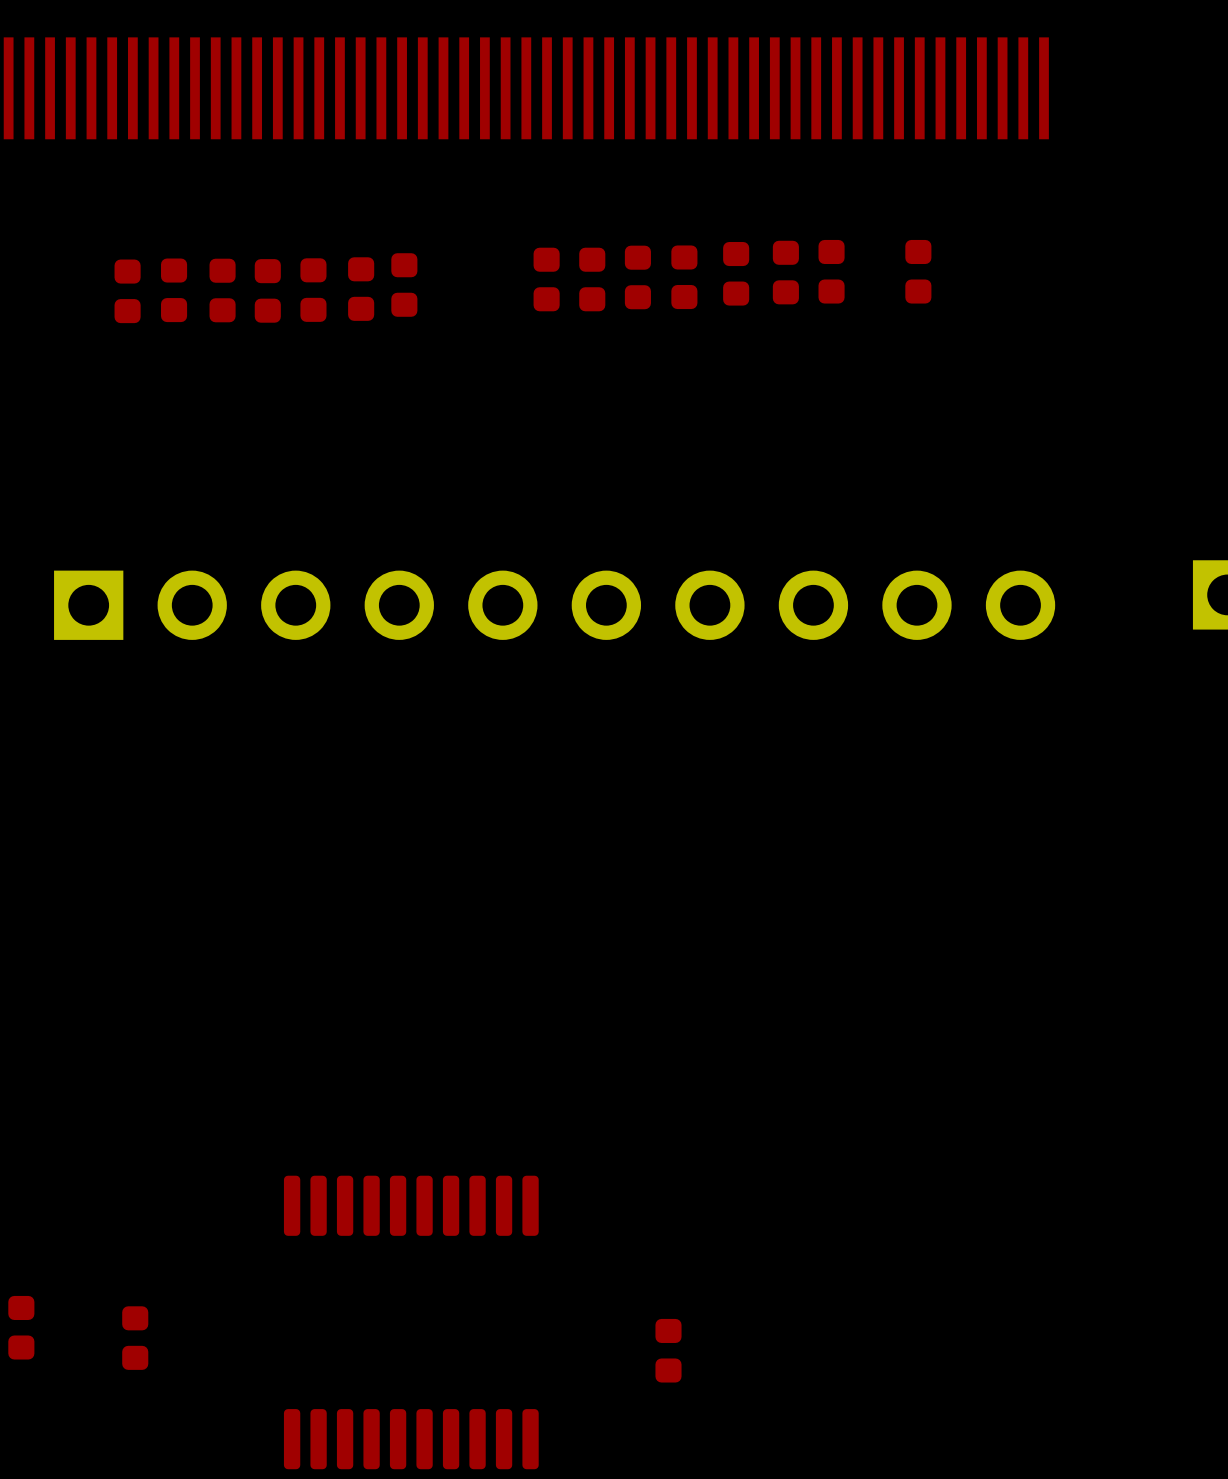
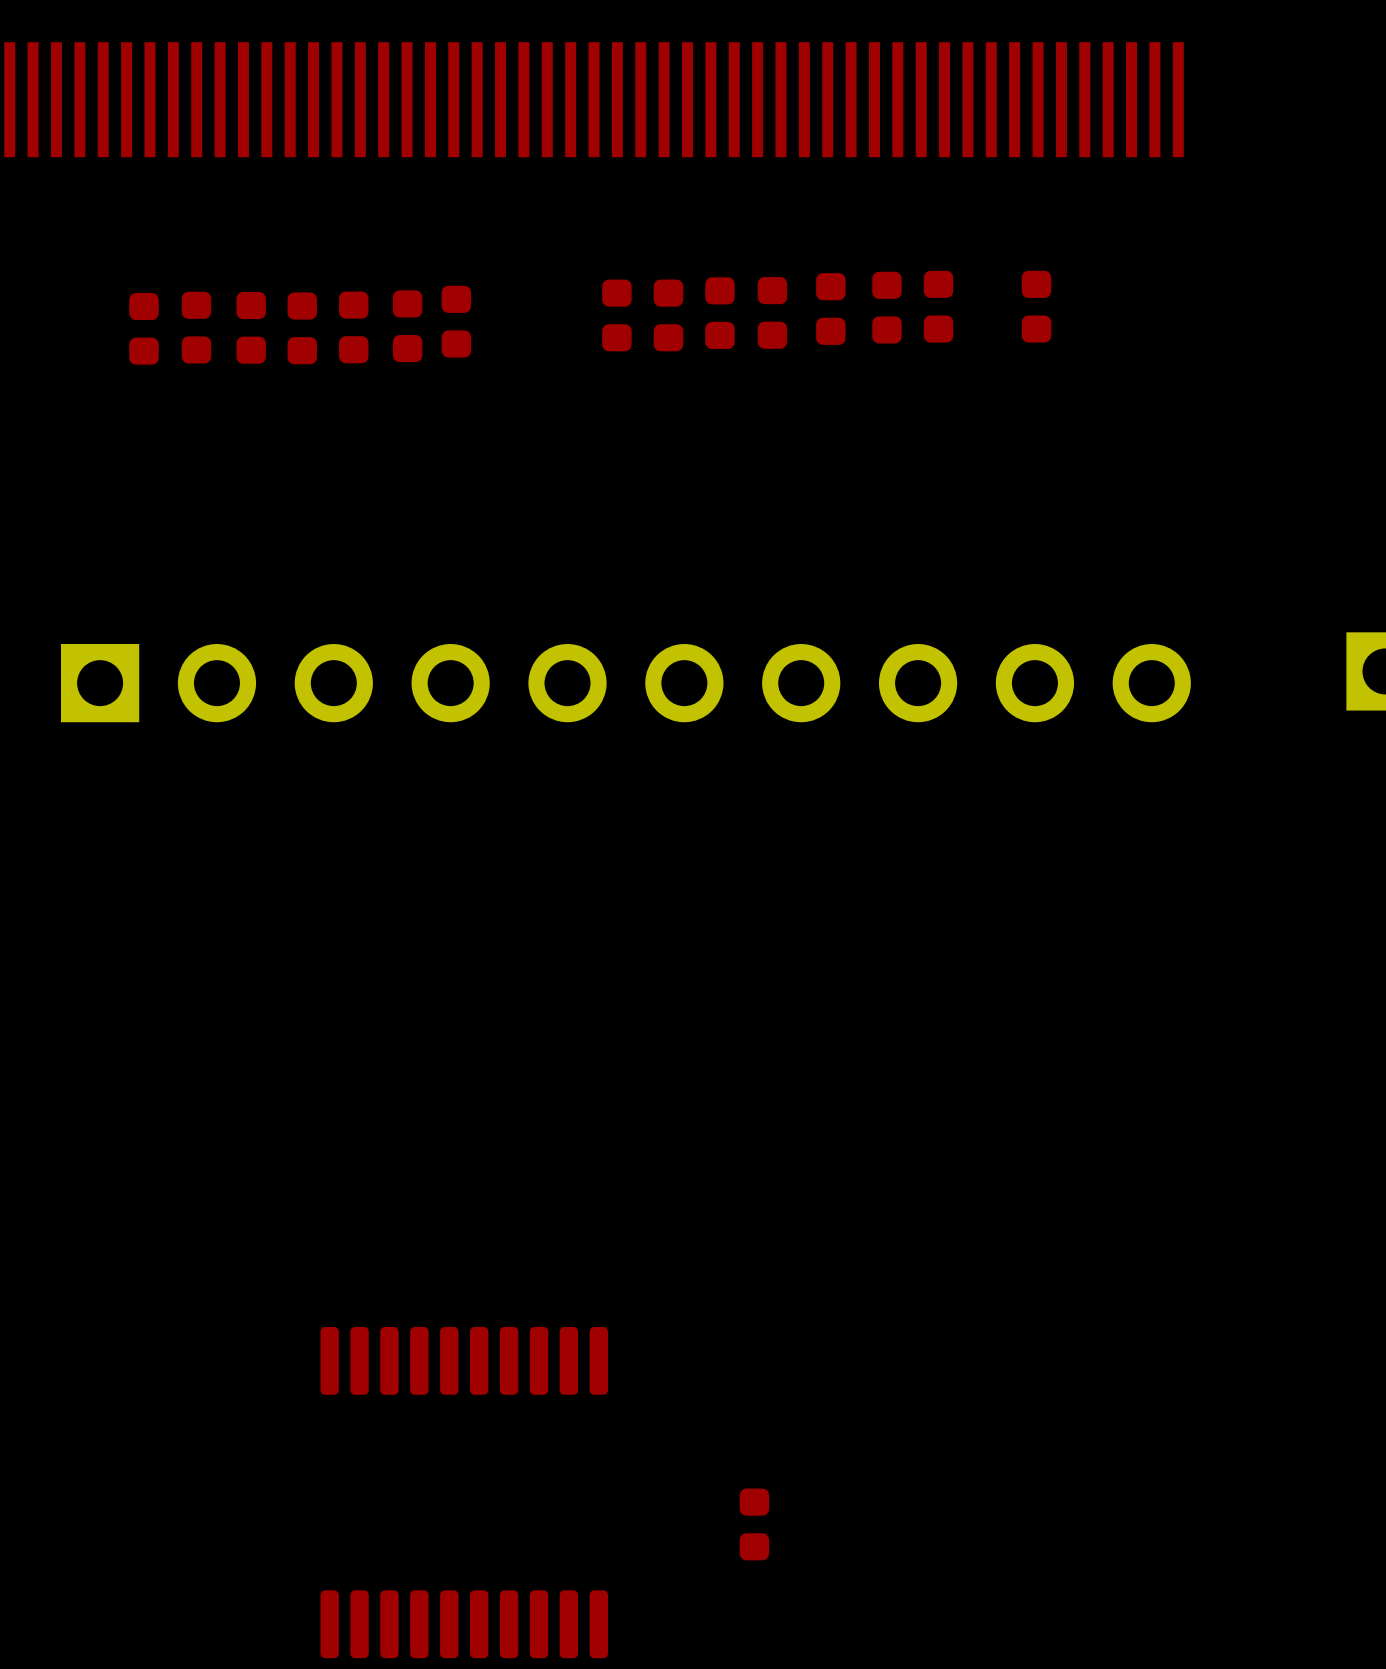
part: (21, 1327) -> none
part: (135, 1338) -> none

